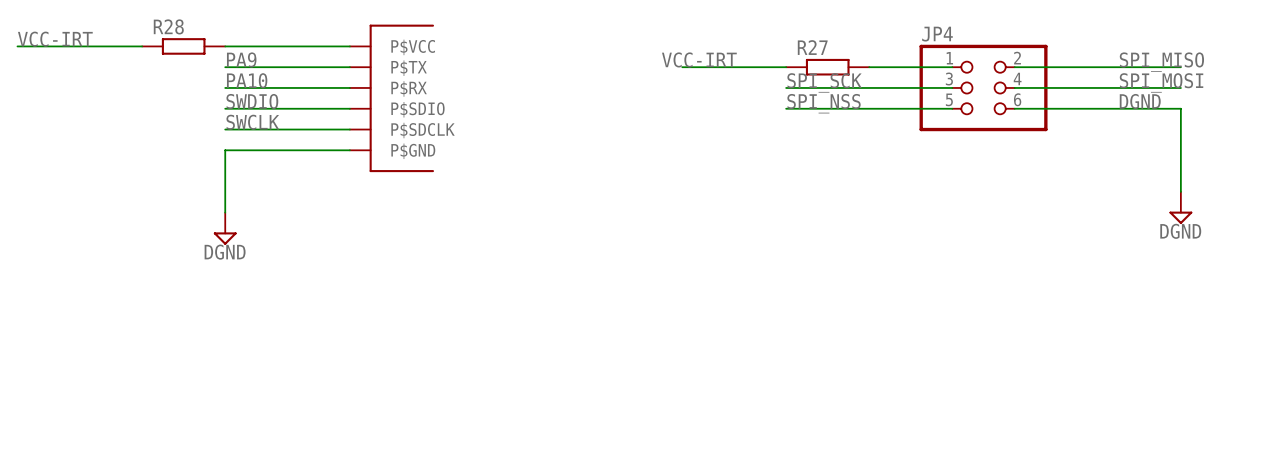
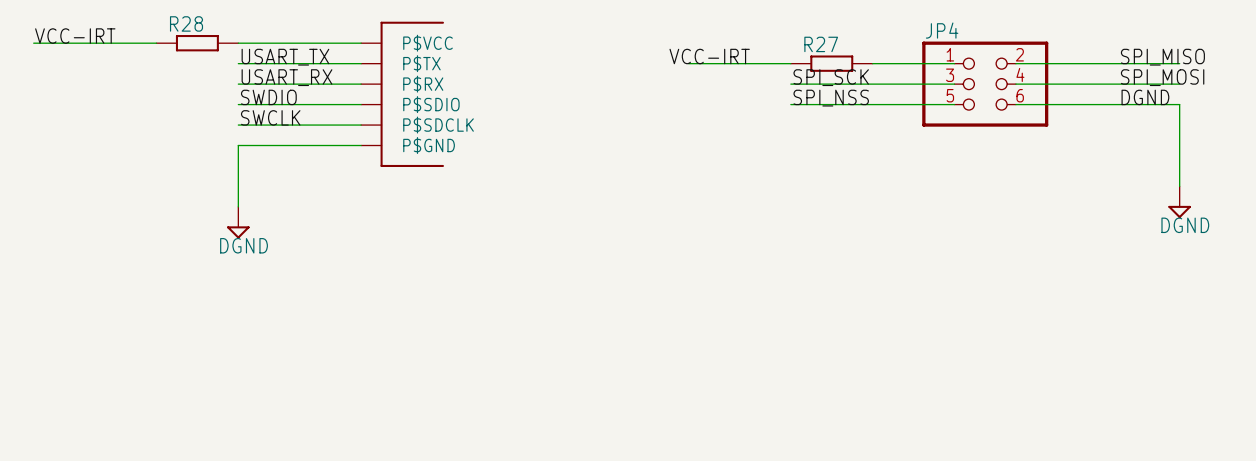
label: PA9 (241, 59) -> USART_TX (285, 57)
label: PA10 (247, 80) -> USART_RX (286, 77)

